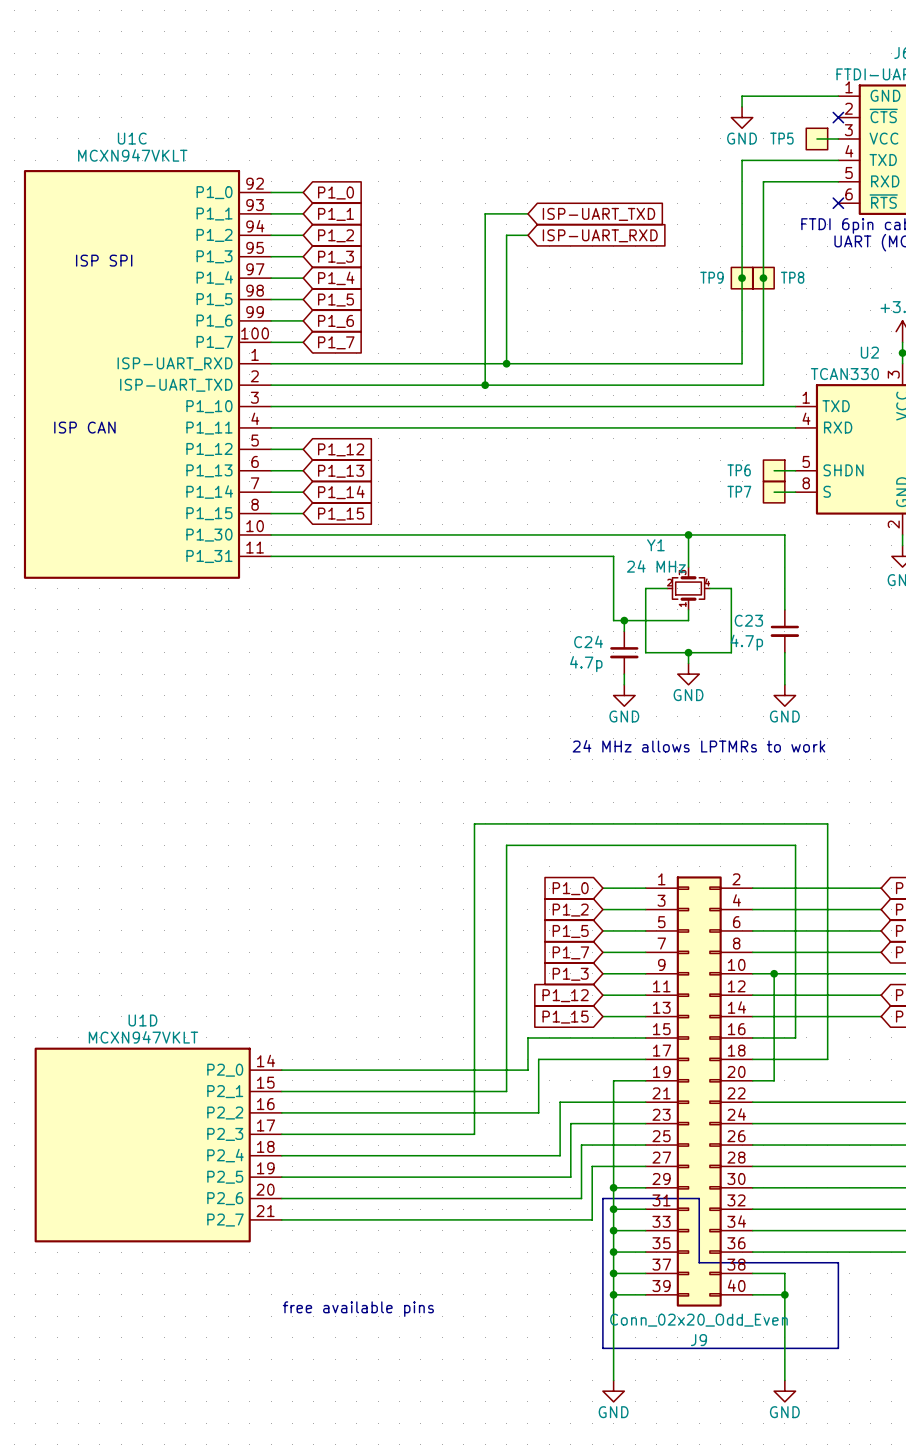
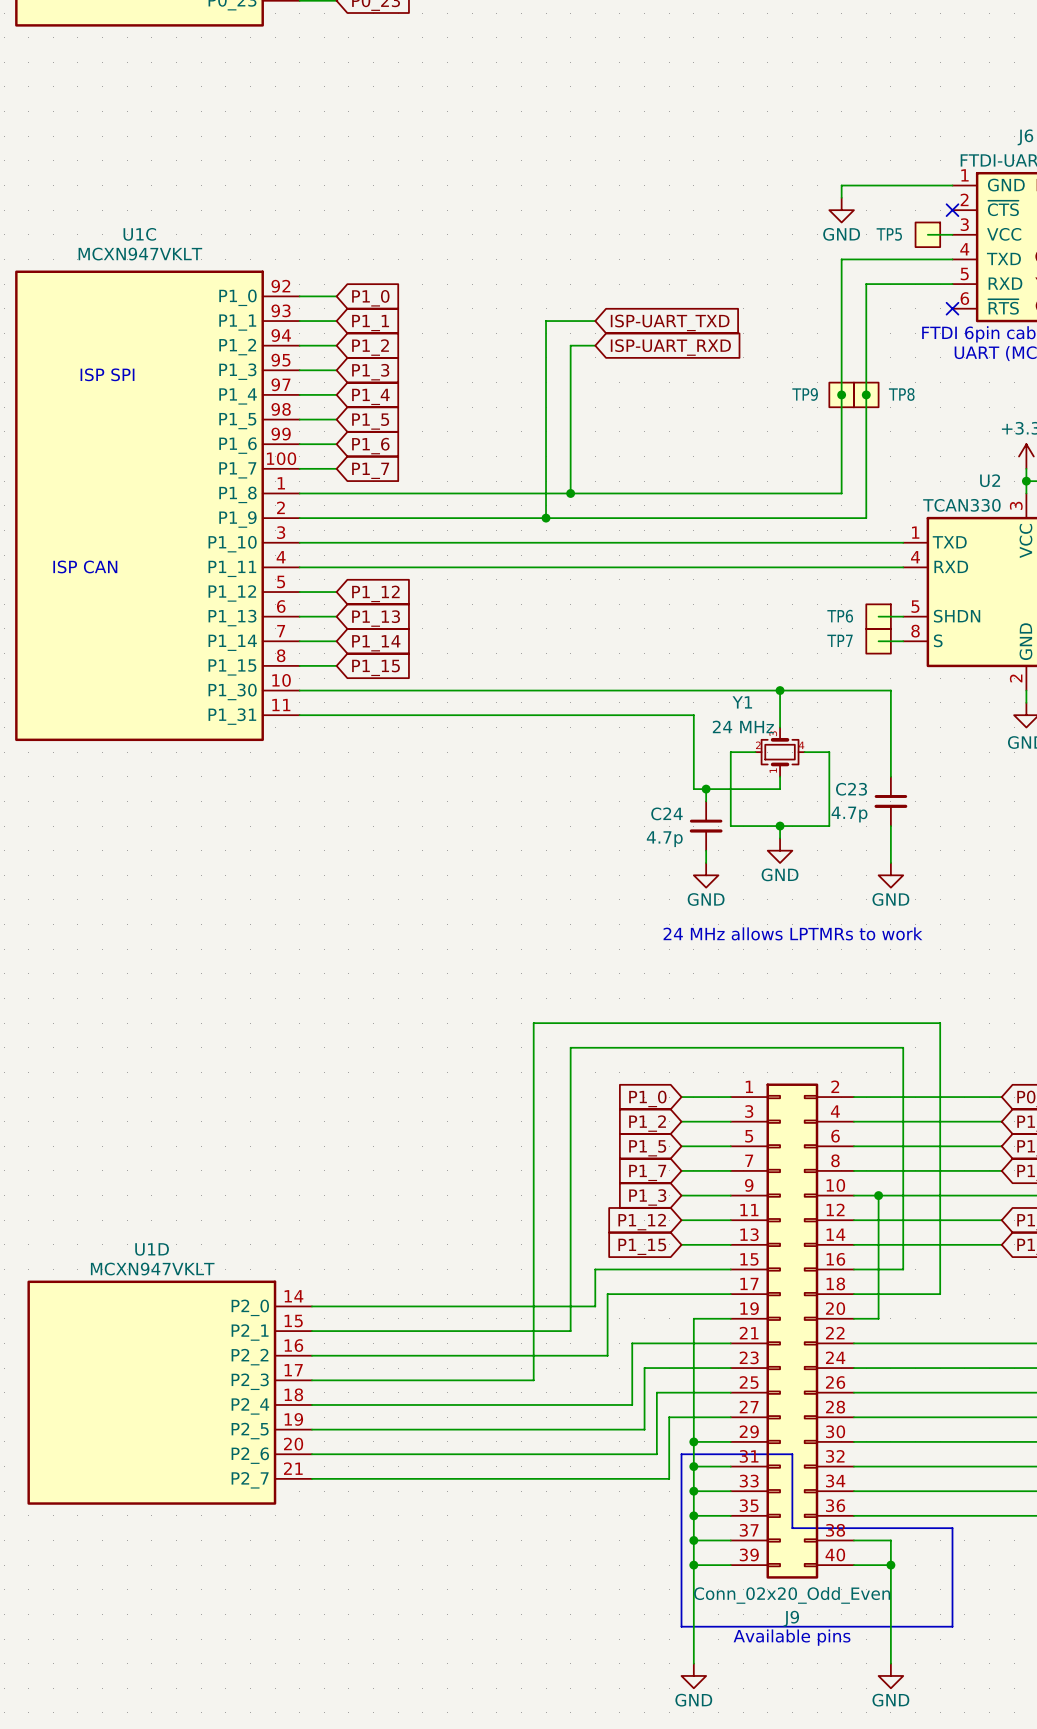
U1C pin name: ISP-UART_RXD (175, 363) -> P1_8 (237, 494)
U1C pin name: ISP-UART_TXD (176, 385) -> P1_9 (237, 519)
text: free available pins (358, 1309) -> none
text: none -> Available pins (792, 1637)

